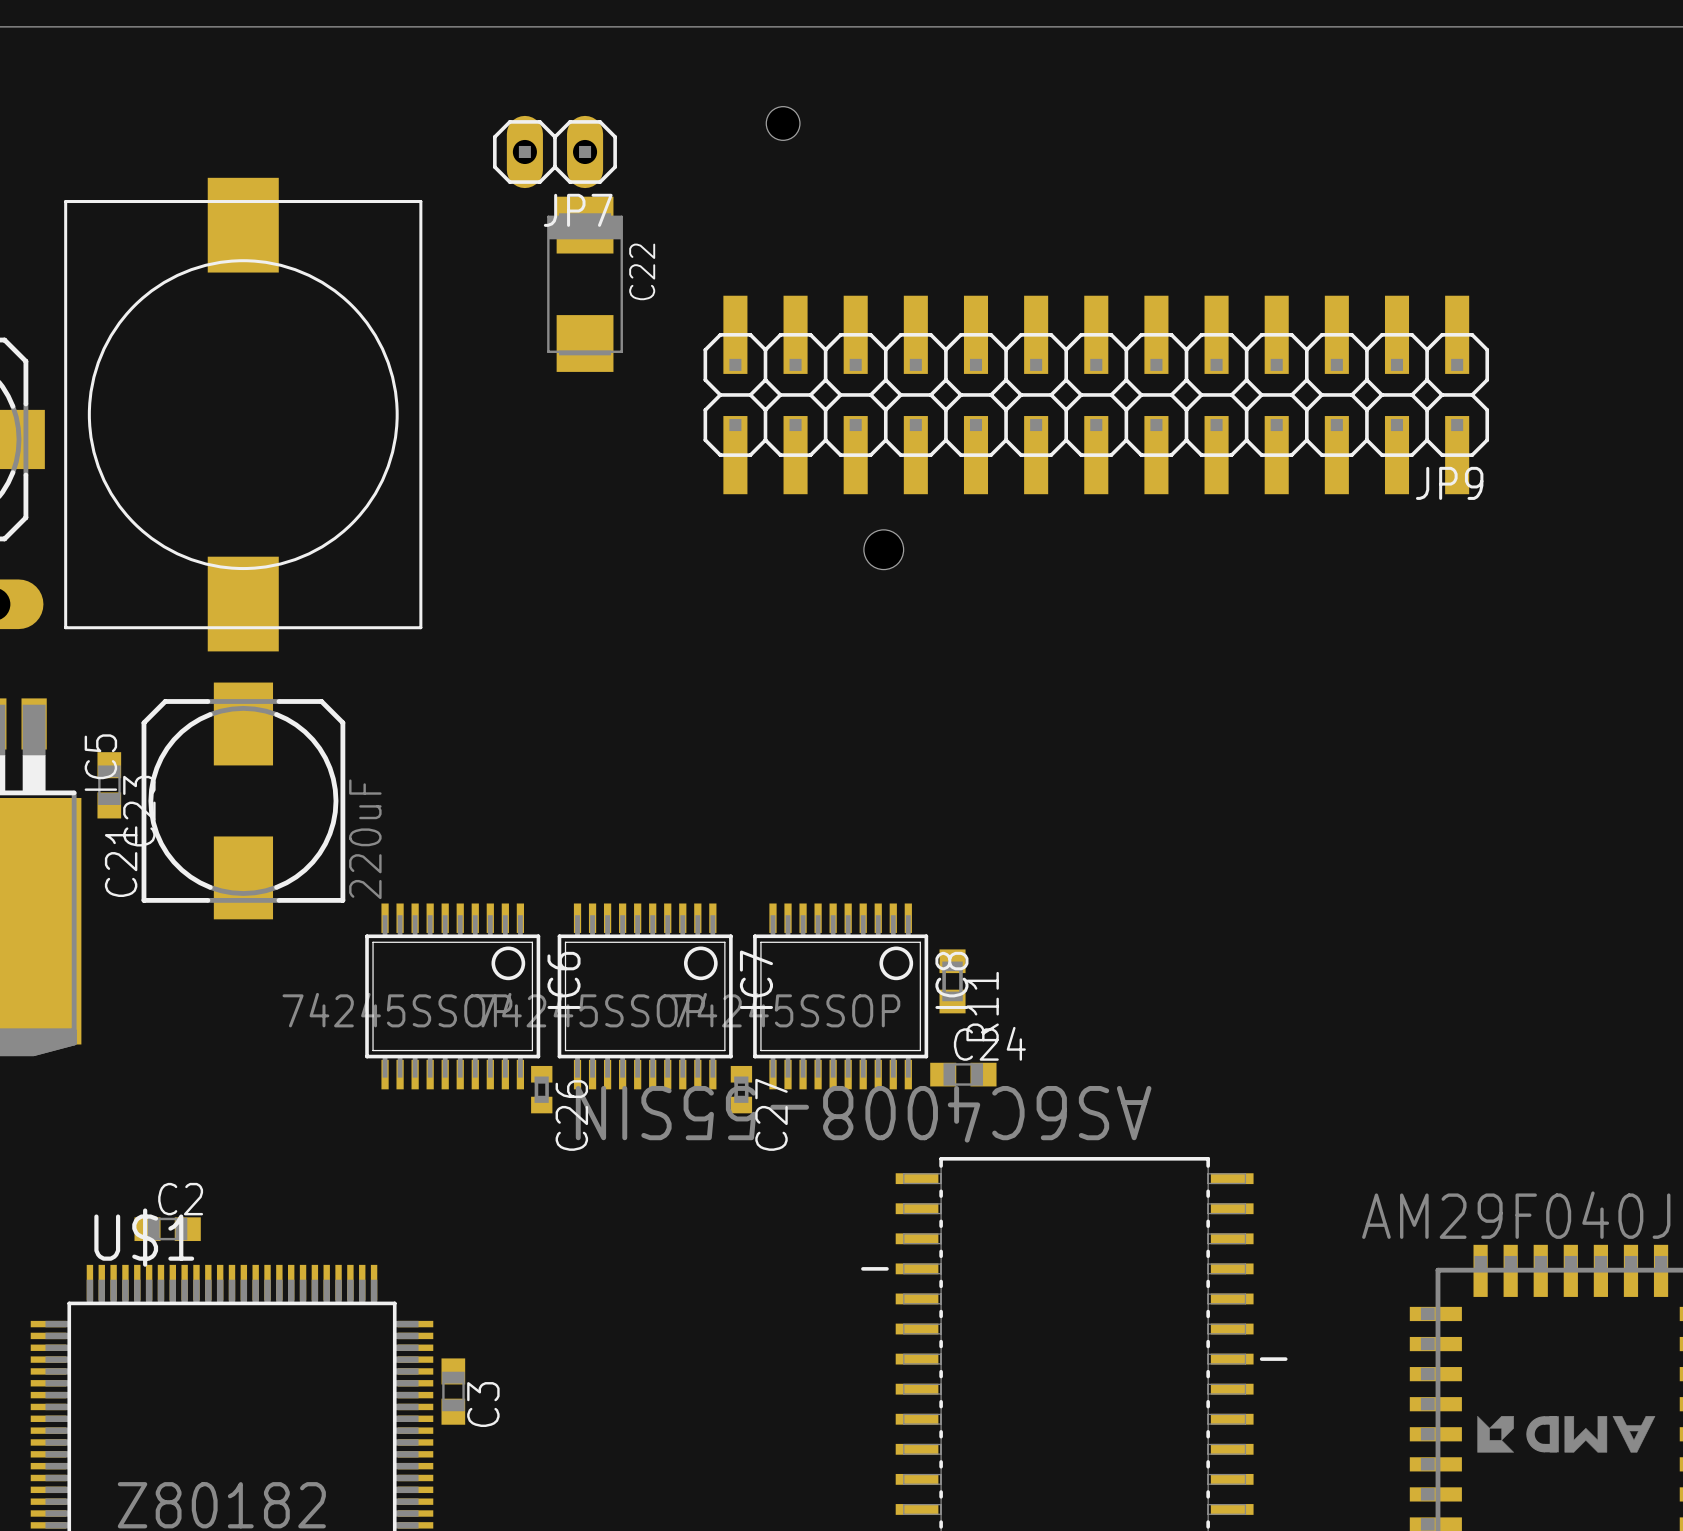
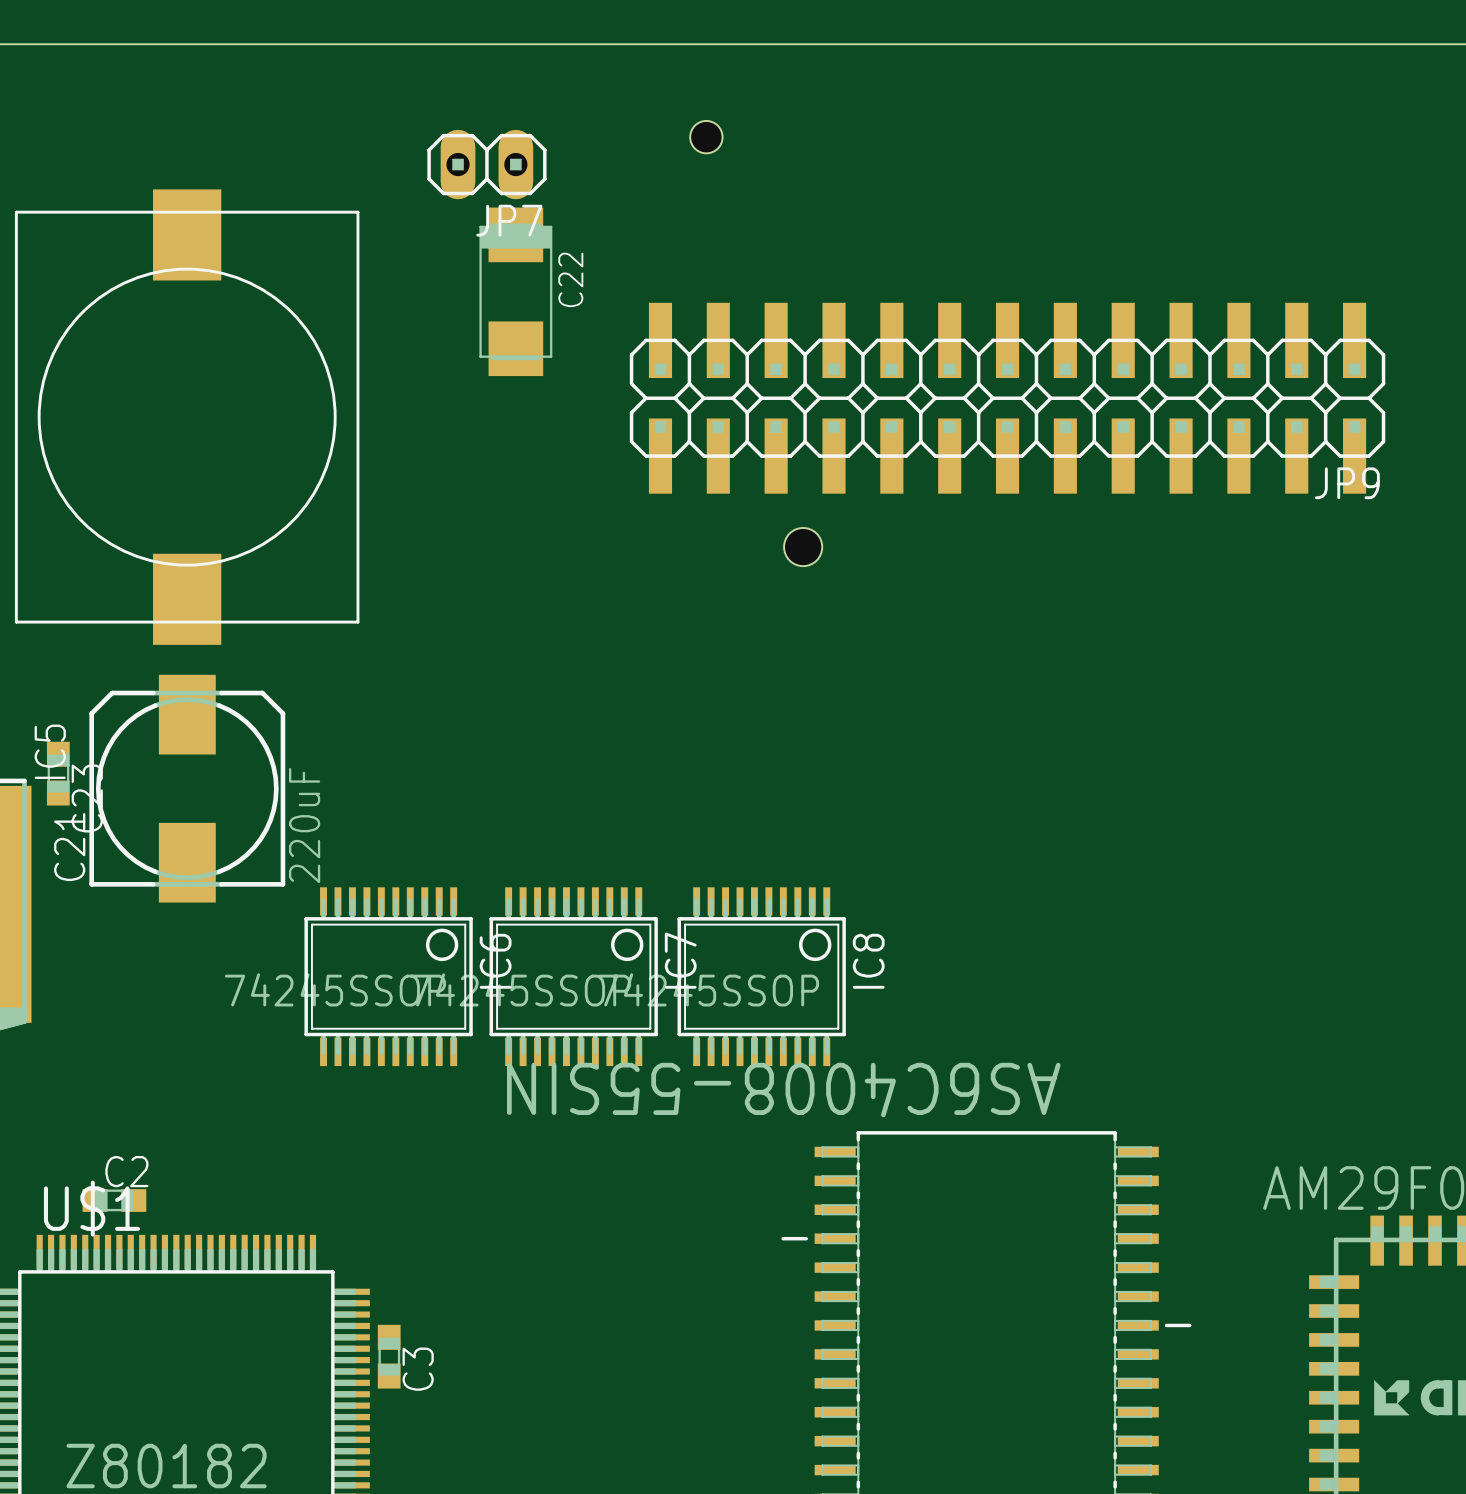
R11: (952, 981) -> none
C24: (963, 1074) -> none
C26: (541, 1089) -> none
C27: (741, 1089) -> none

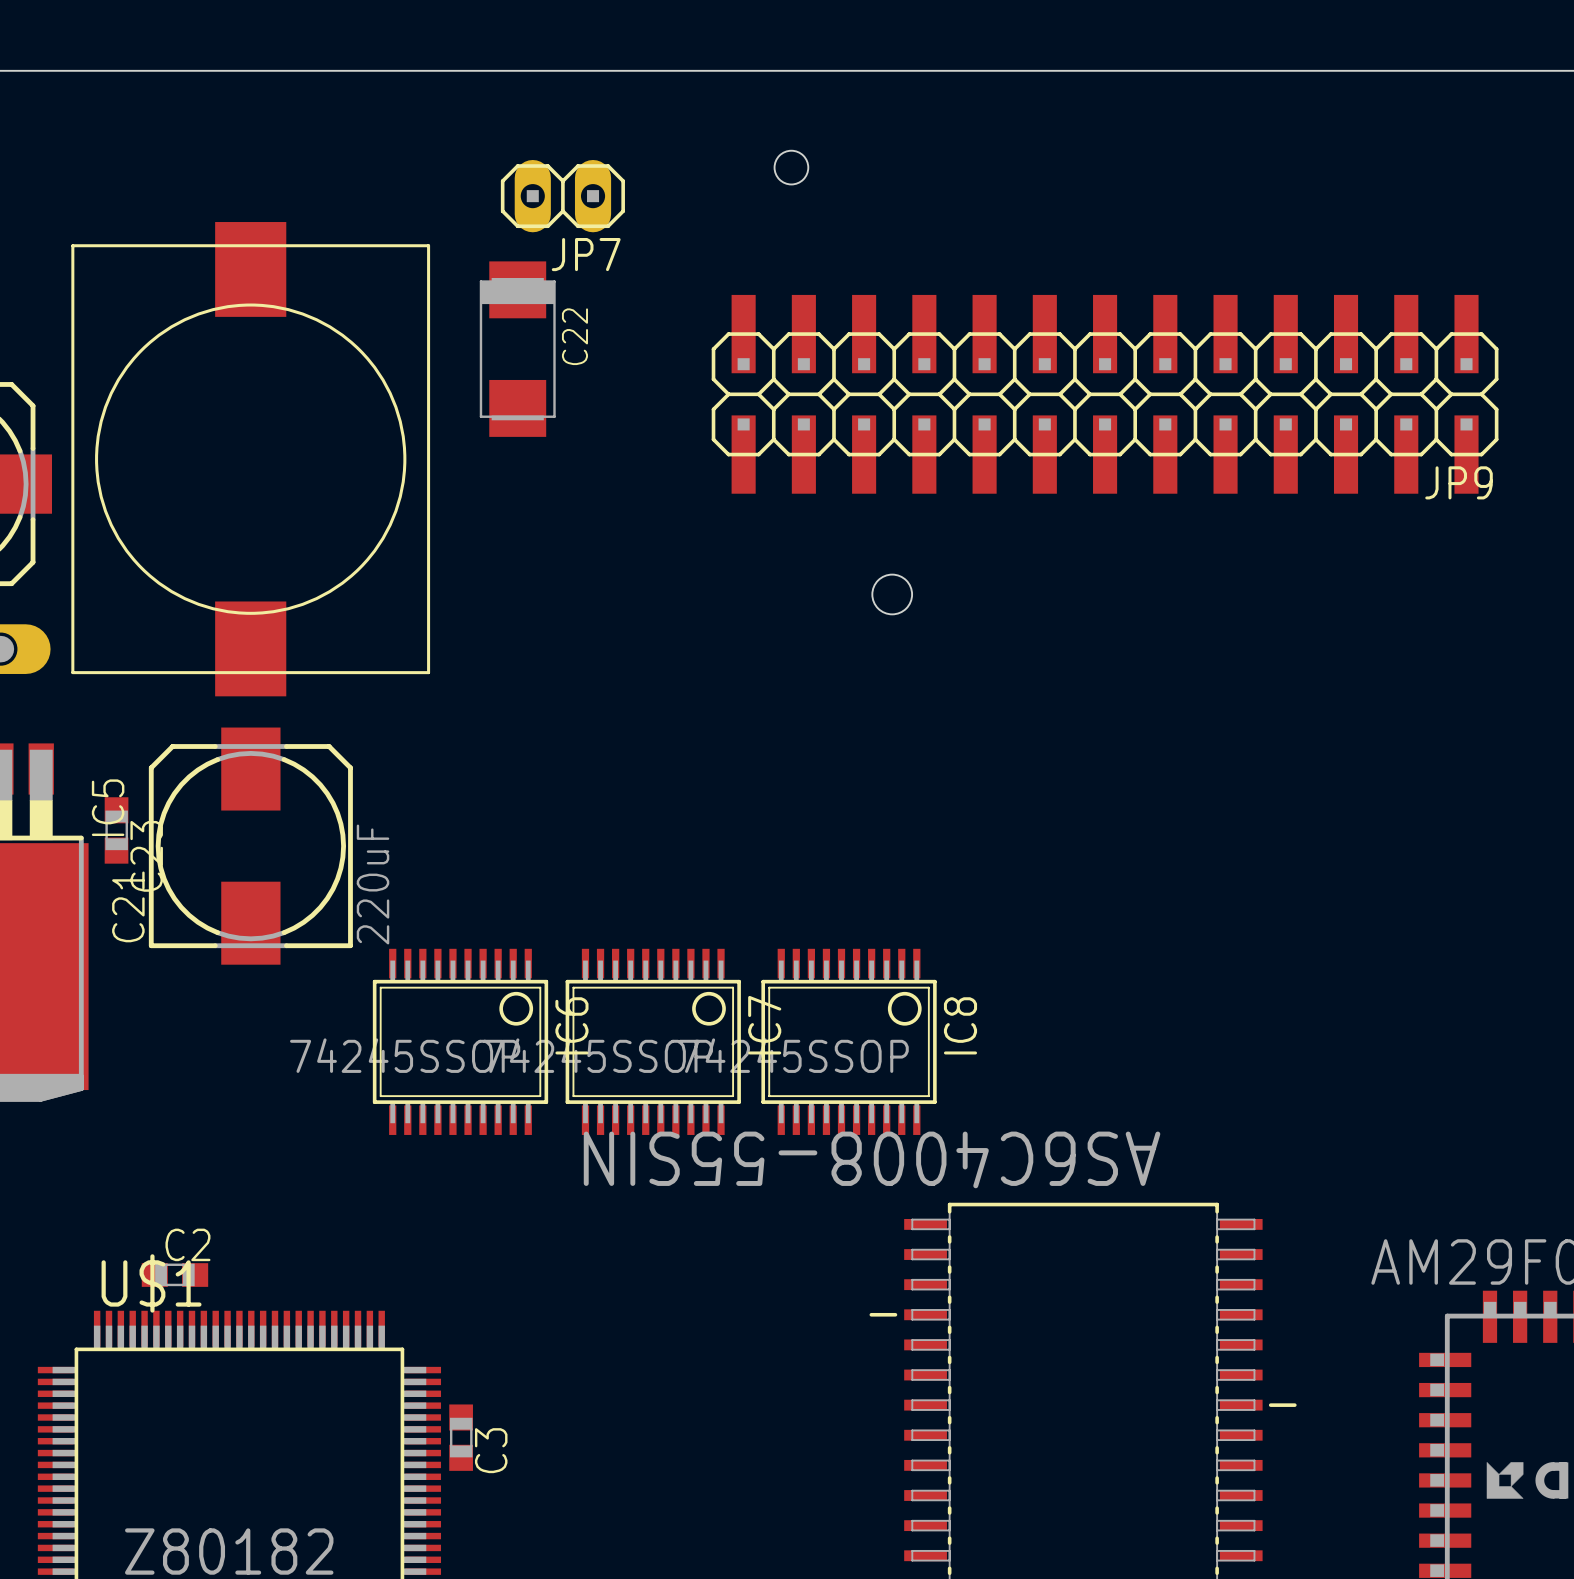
C22 position: (515, 291) -> (517, 349)
JP9 position: (1007, 398) -> (1105, 394)

